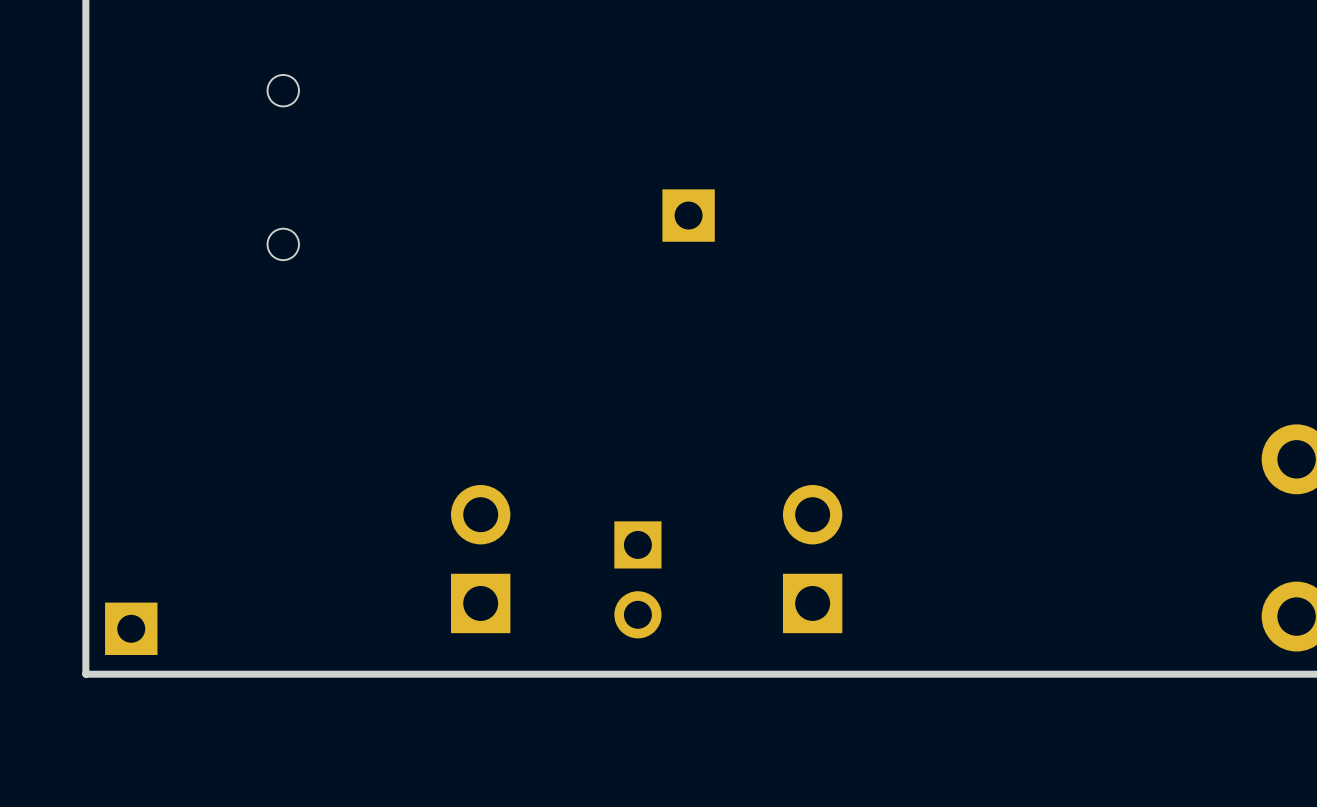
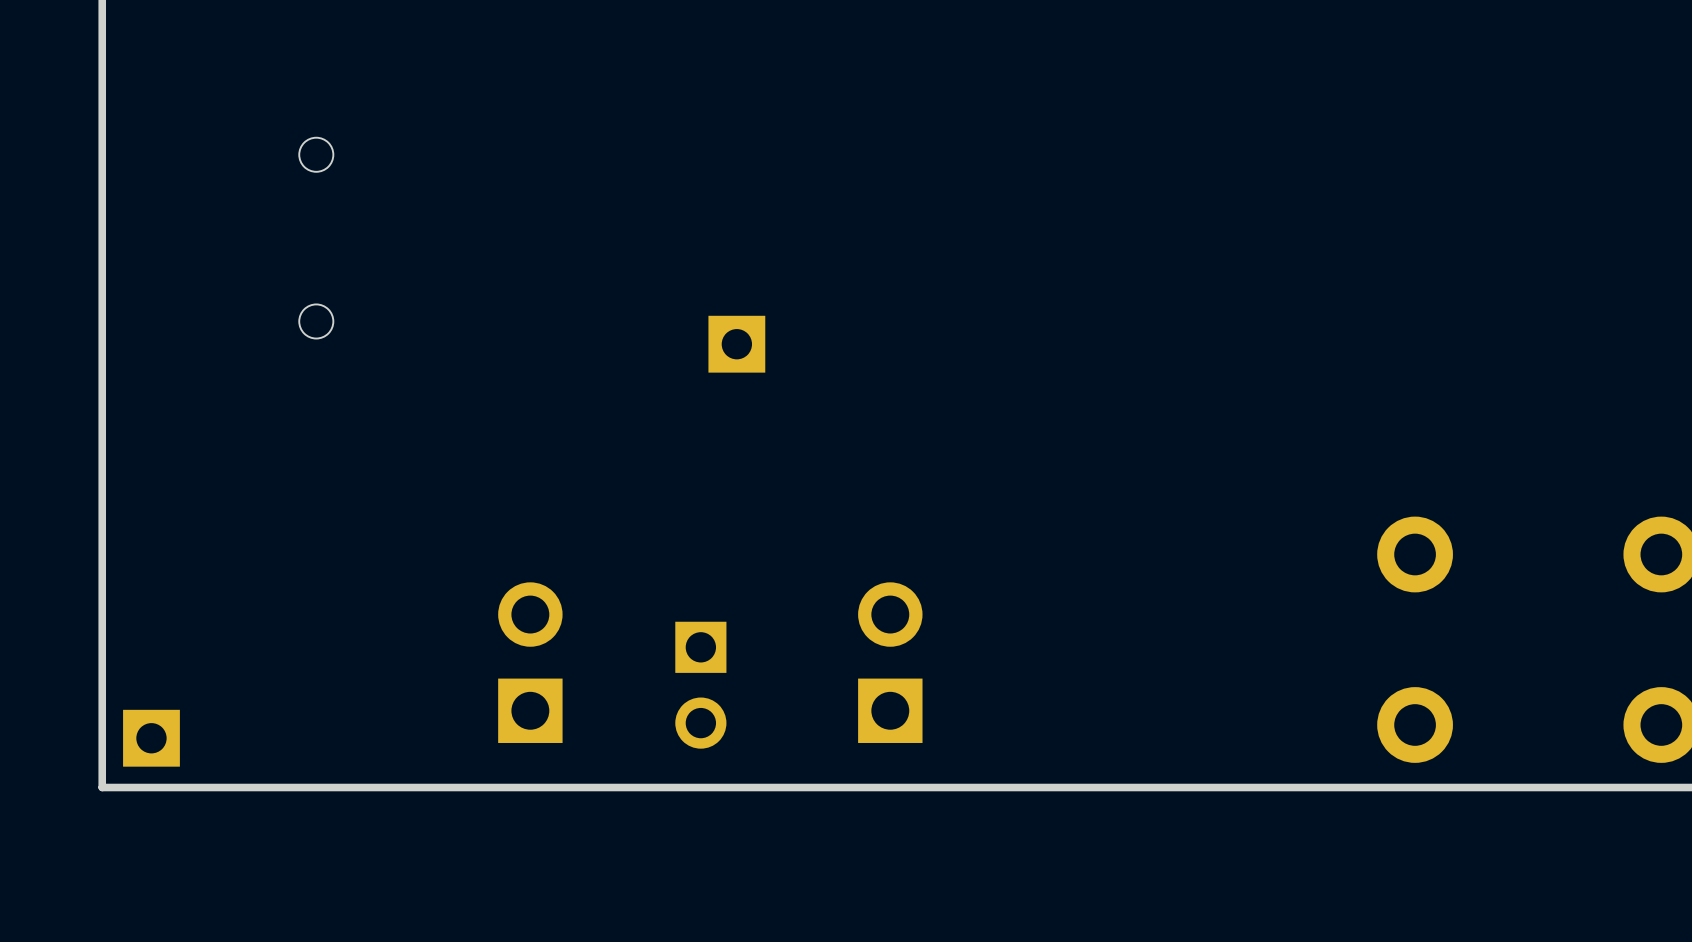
part position: (688, 215) -> (736, 344)

